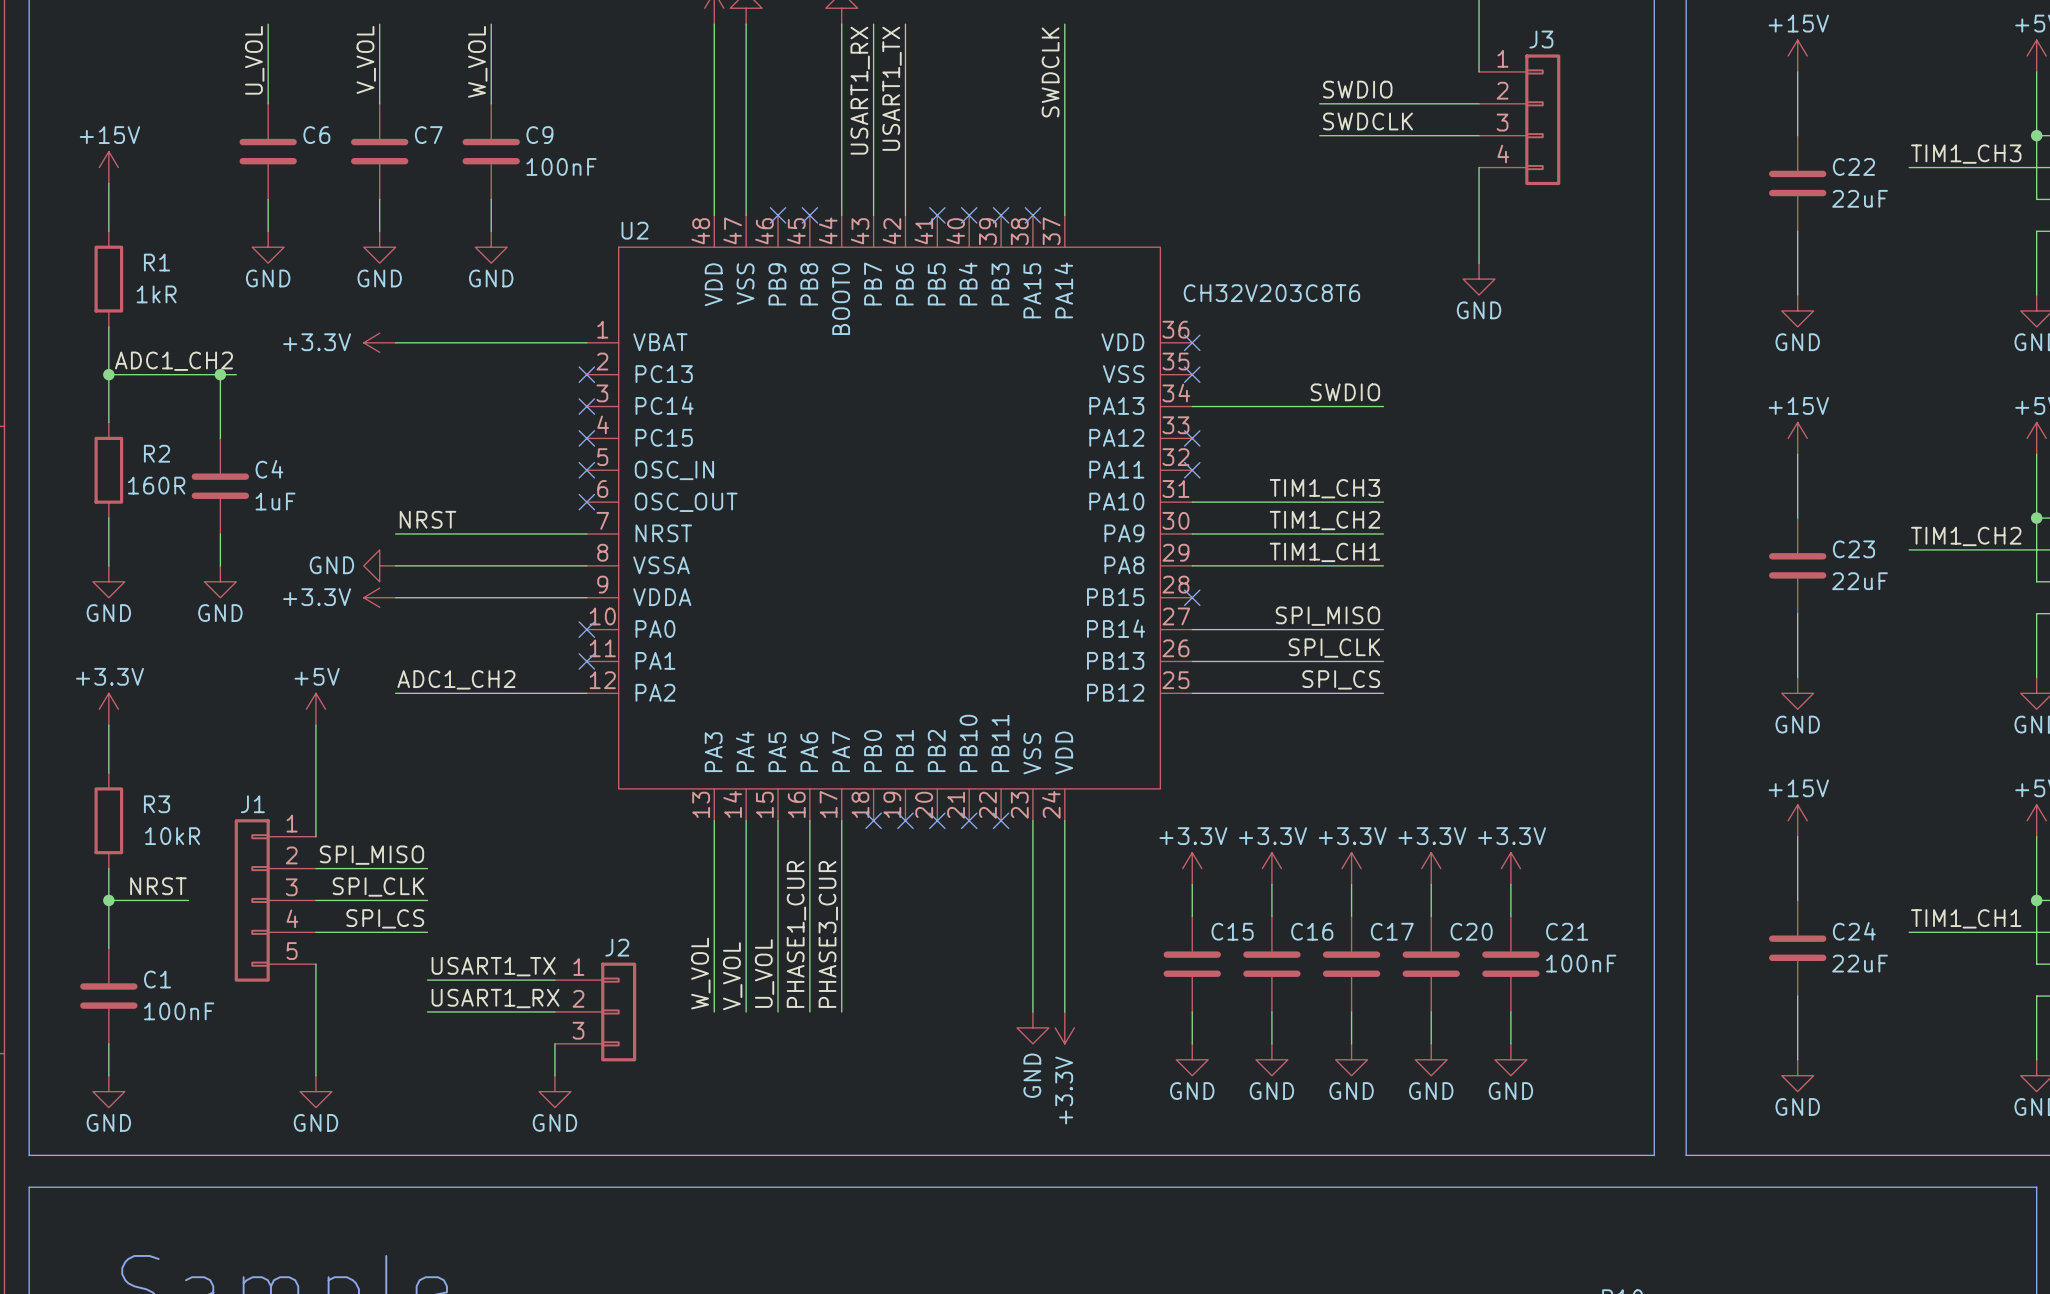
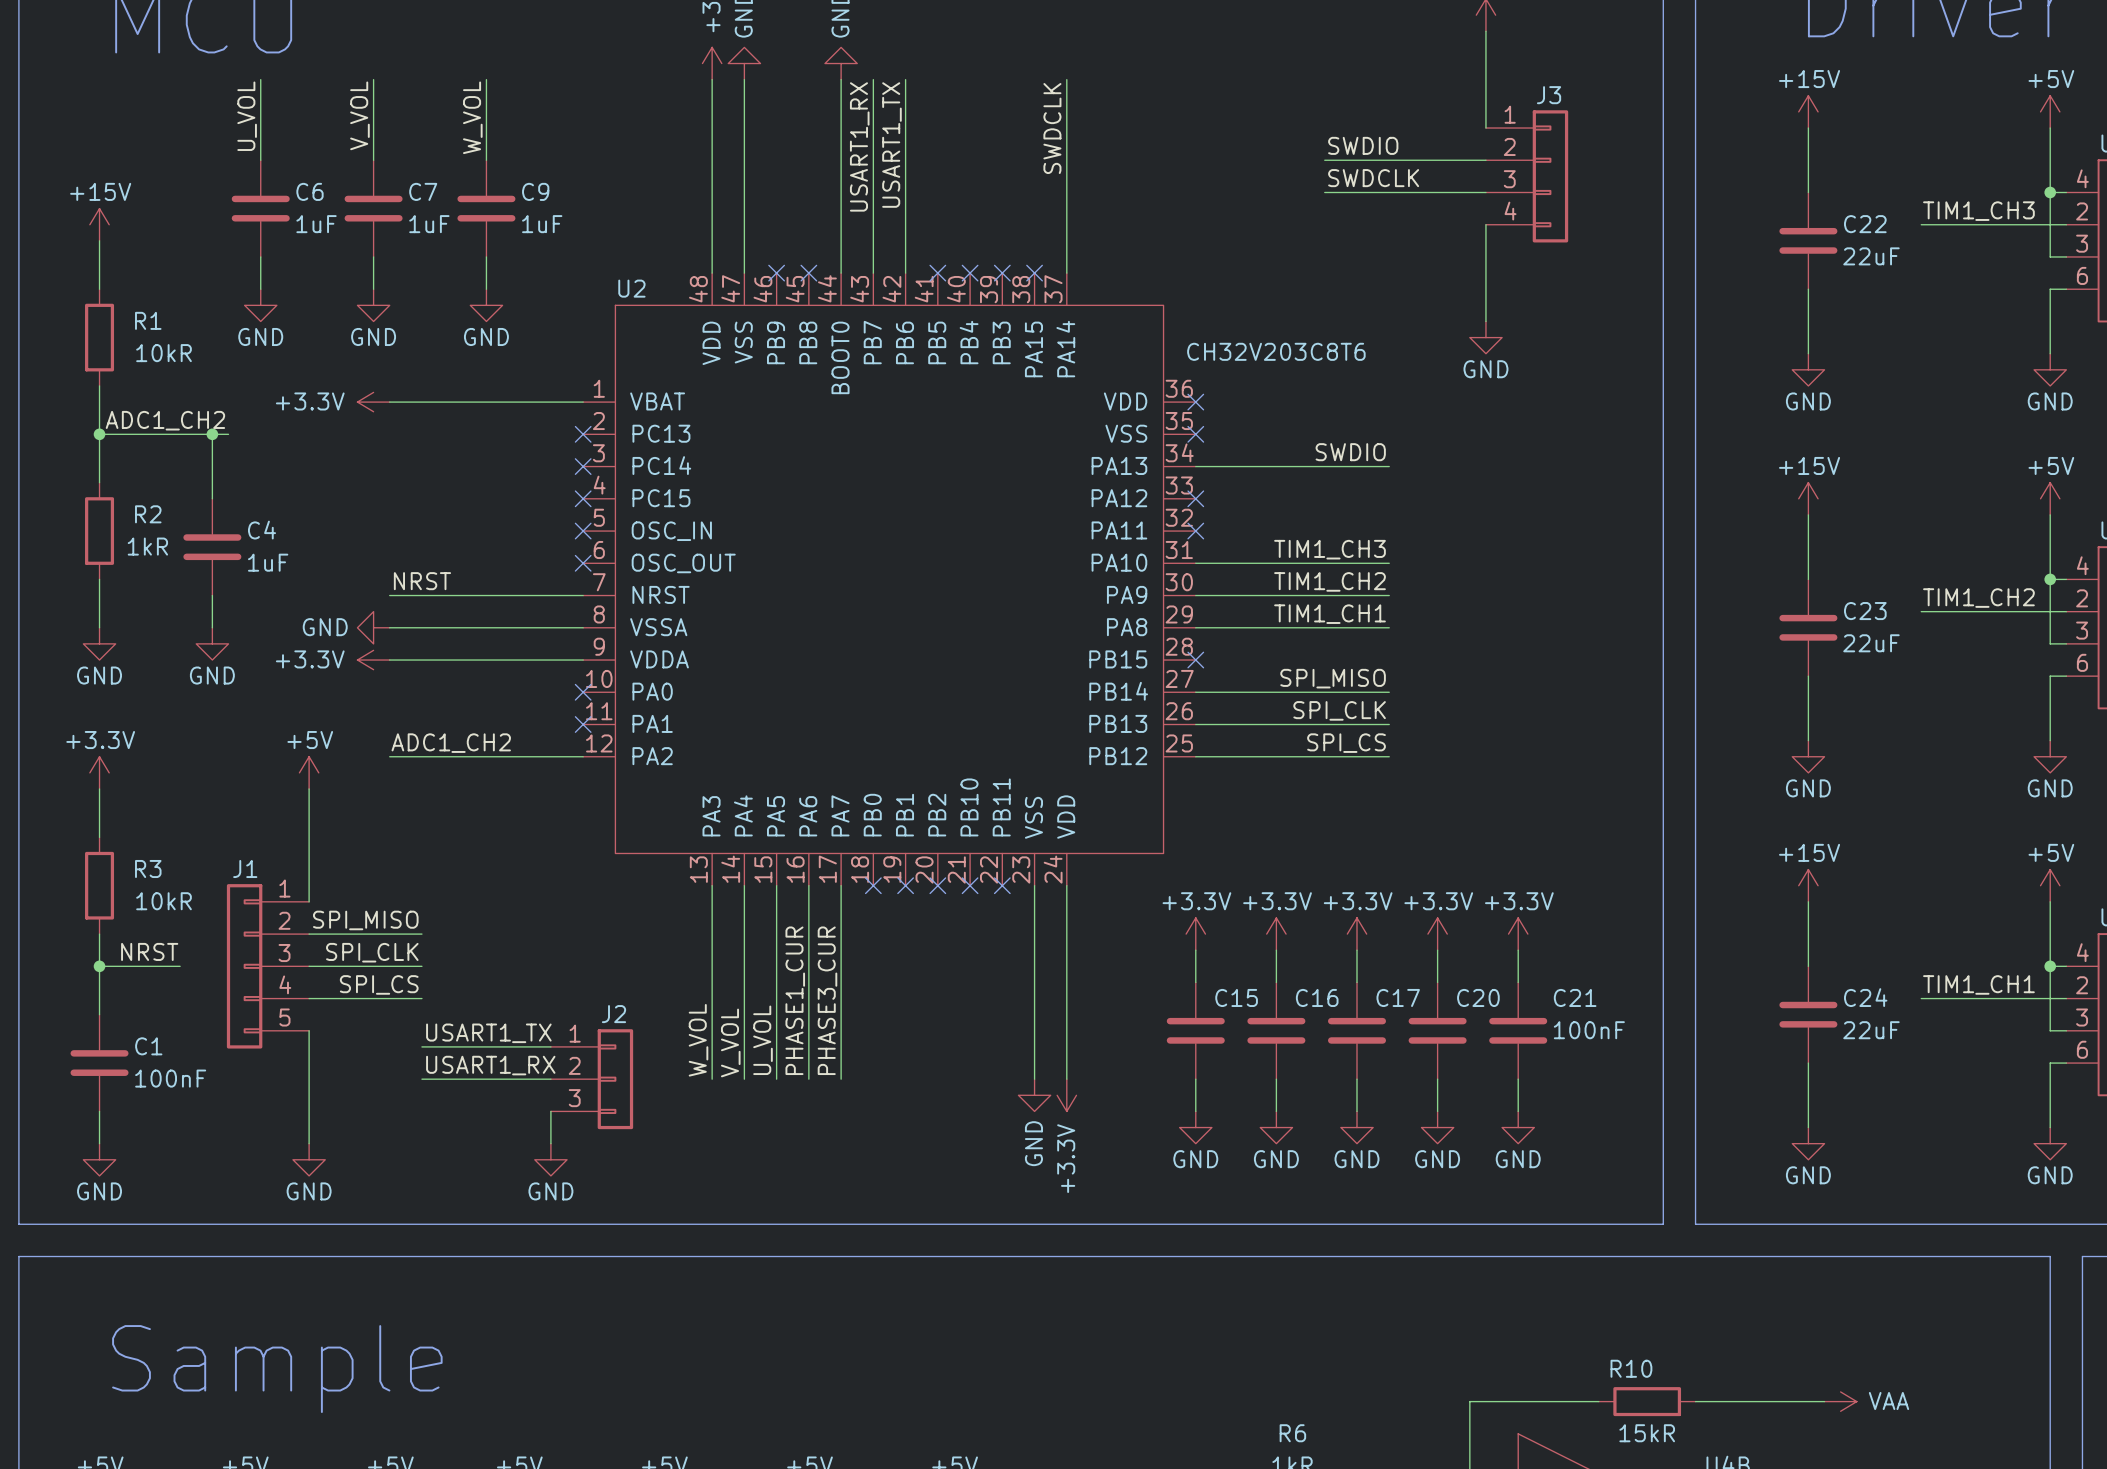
C6 value: none -> 1uF (316, 224)
C7 value: none -> 1uF (429, 224)
C9 value: 100nF (561, 166) -> 1uF (542, 224)
R1 value: 1kR (156, 294) -> 10kR (164, 353)
R2 value: 160R (156, 485) -> 1kR (147, 546)

